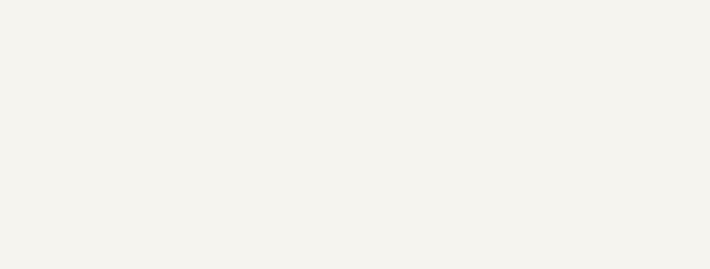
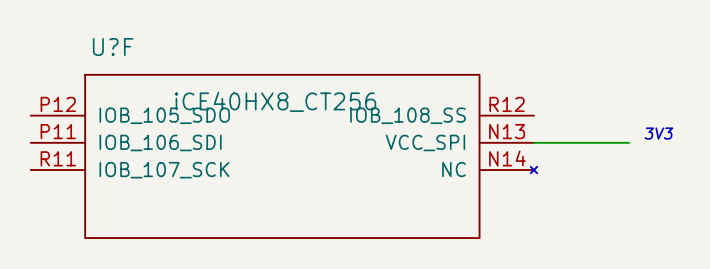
text: none -> 3V3 (658, 133)
wire: none -> (533, 142) (629, 142)
U?F: none -> iCE40HX8_CT256 (283, 156)

